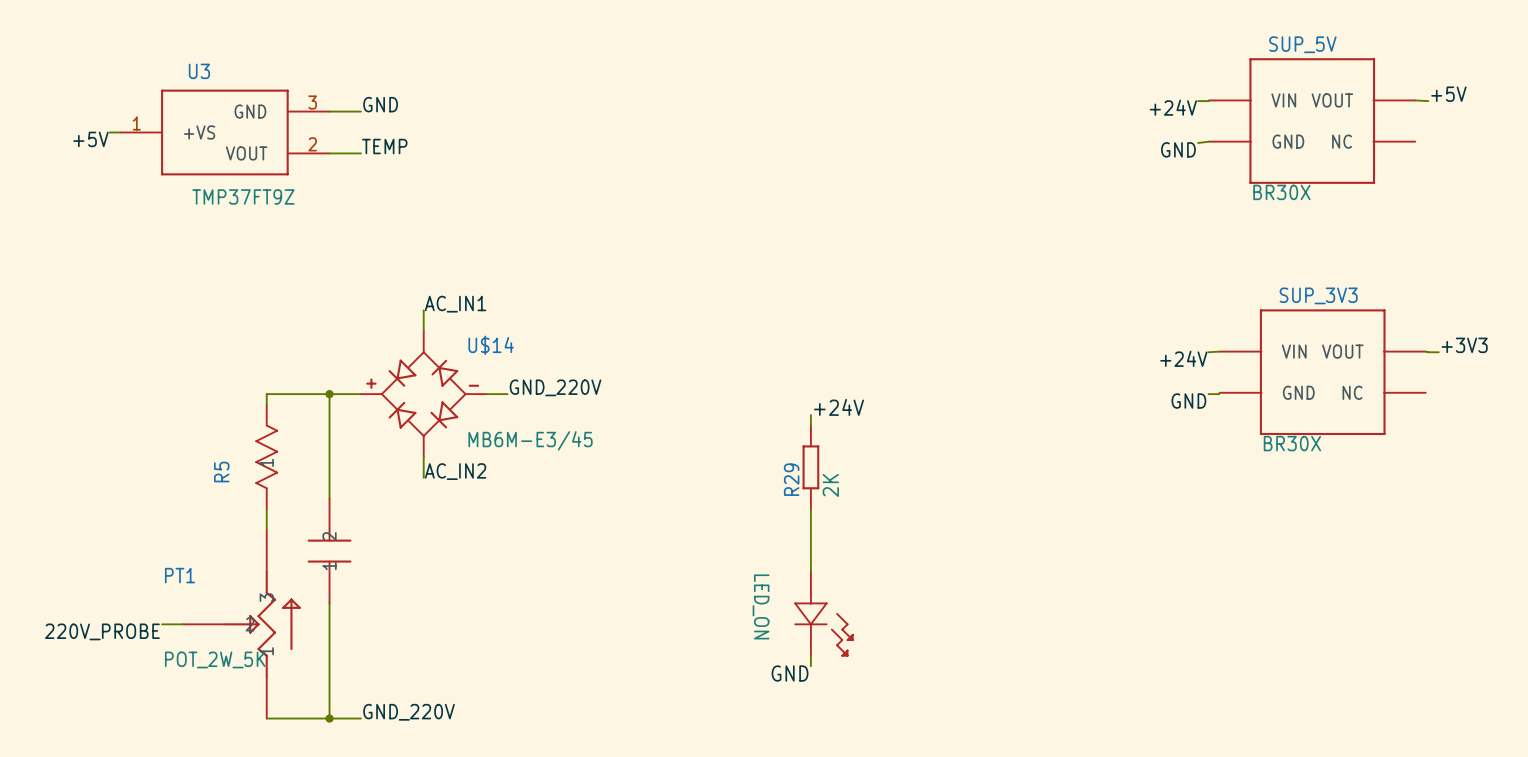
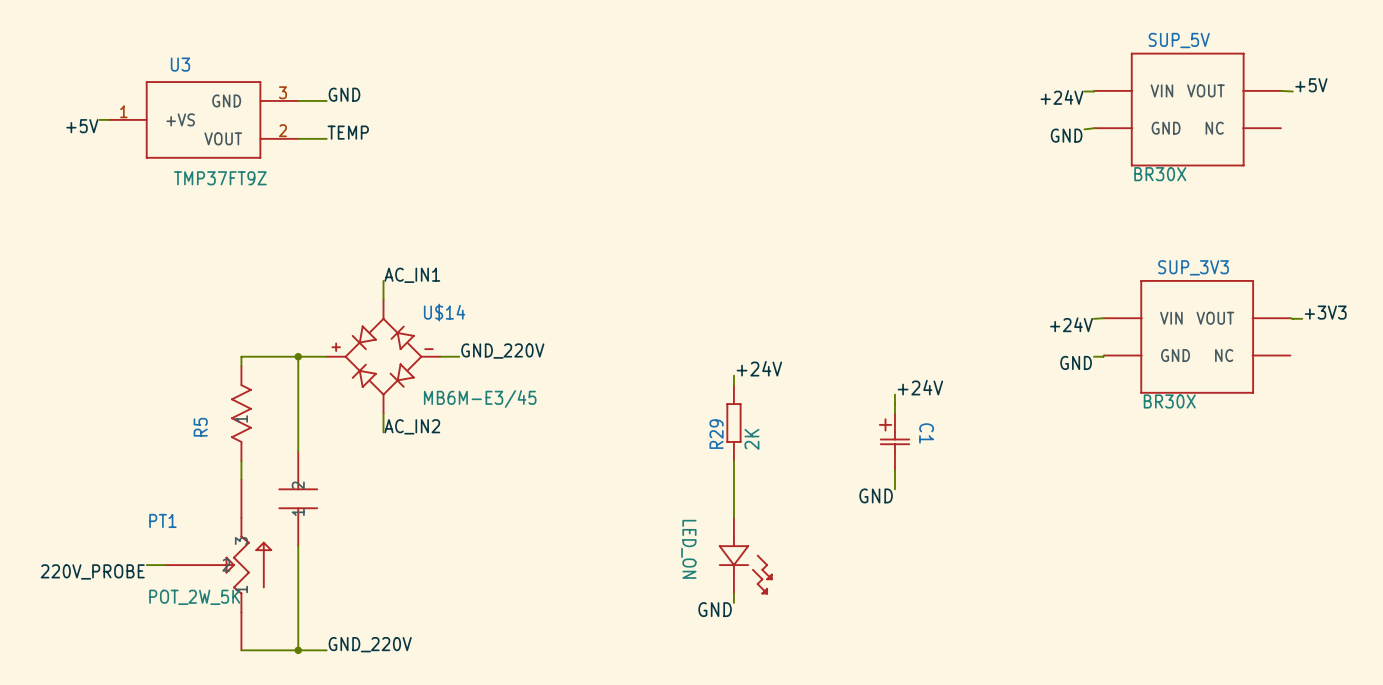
label: none -> +24V (920, 387)
wire: none -> (894, 394) (894, 413)
C1: none -> (894, 441)
wire: none -> (894, 470) (894, 489)
label: none -> GND (876, 495)

